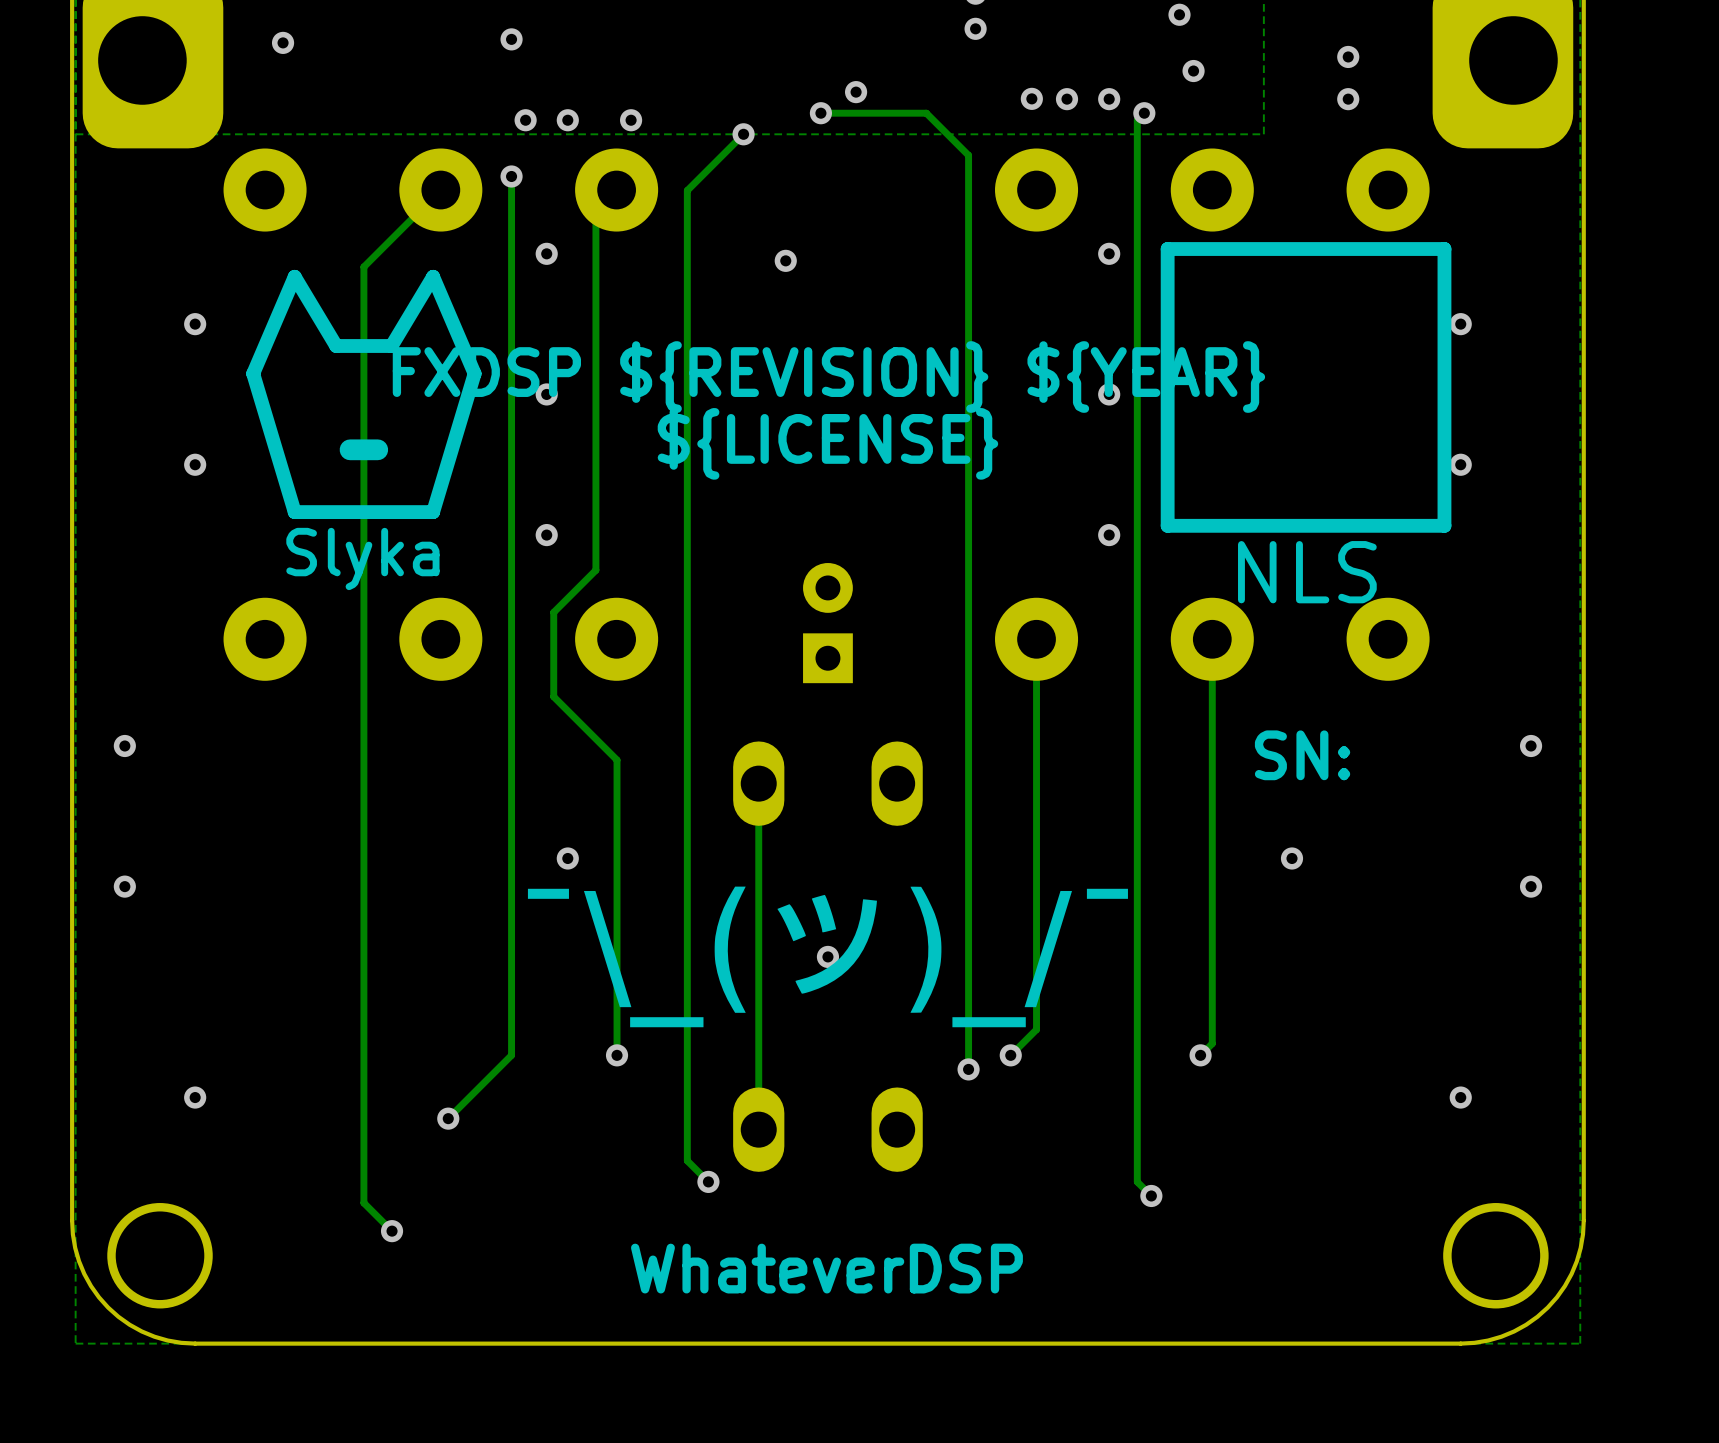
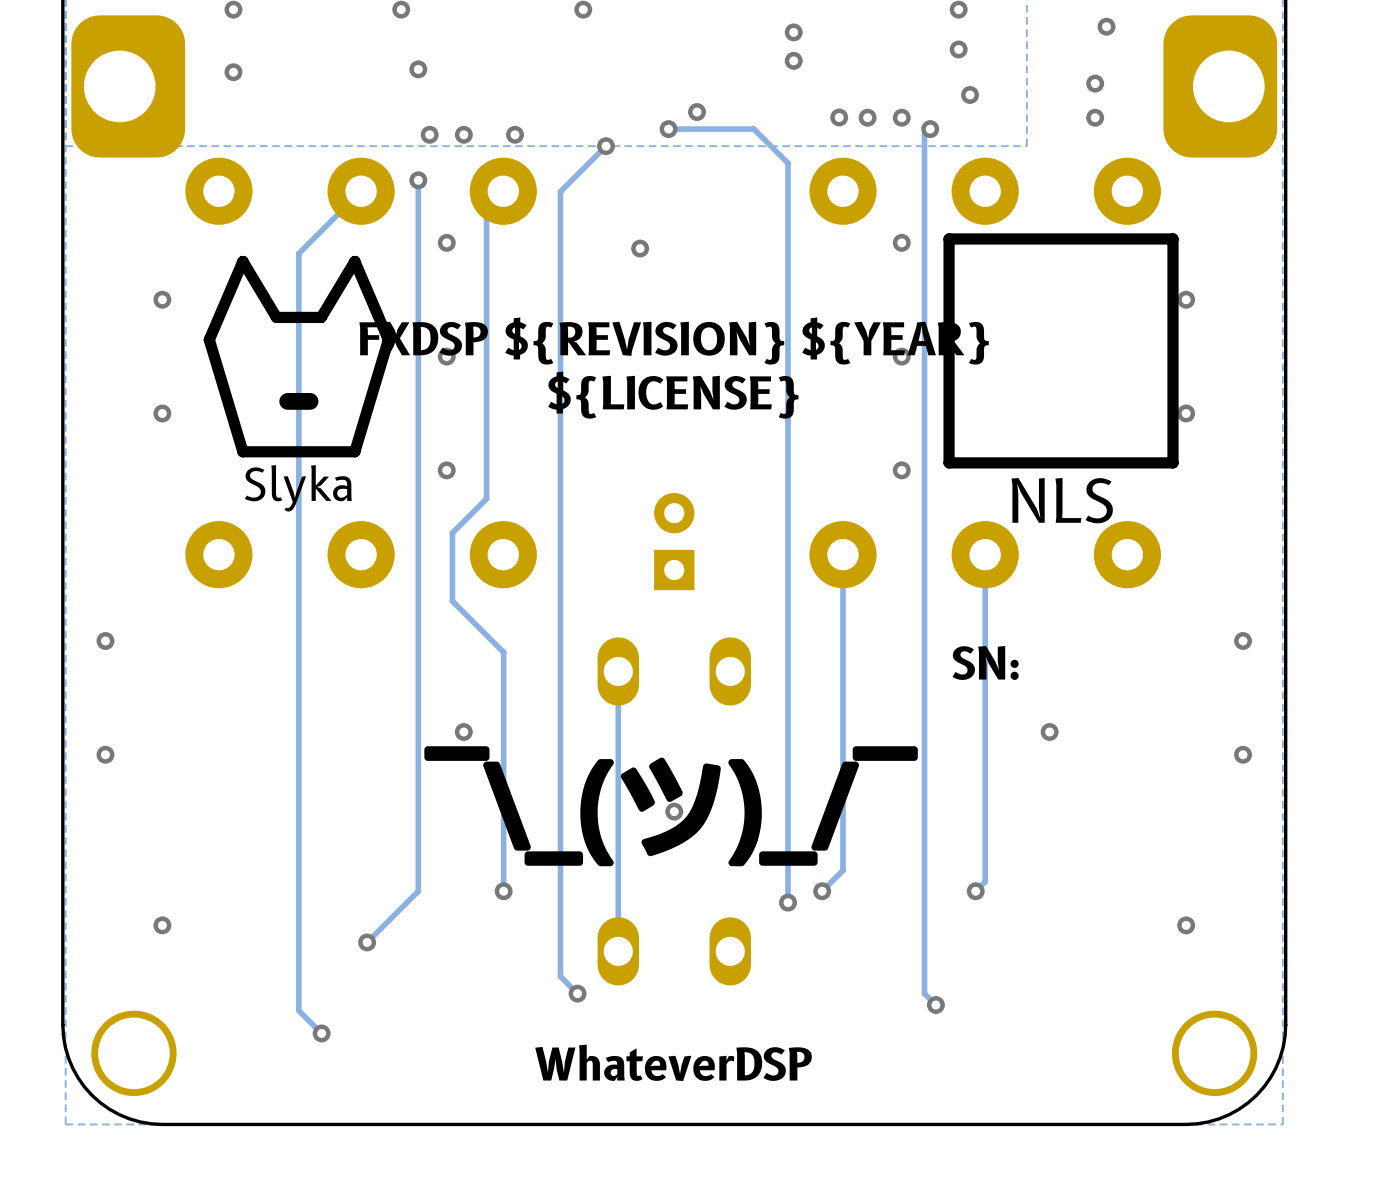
text position: SN: (1302, 755) -> SN: (985, 662)
drawing shape: [527, 886, 1128, 1028] -> [424, 746, 918, 867]

